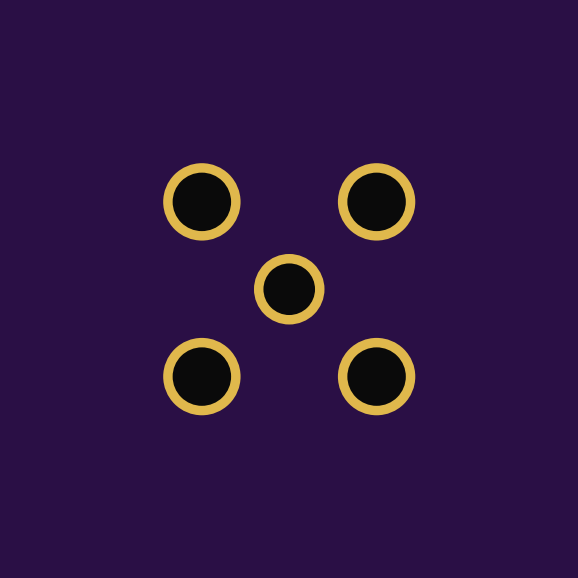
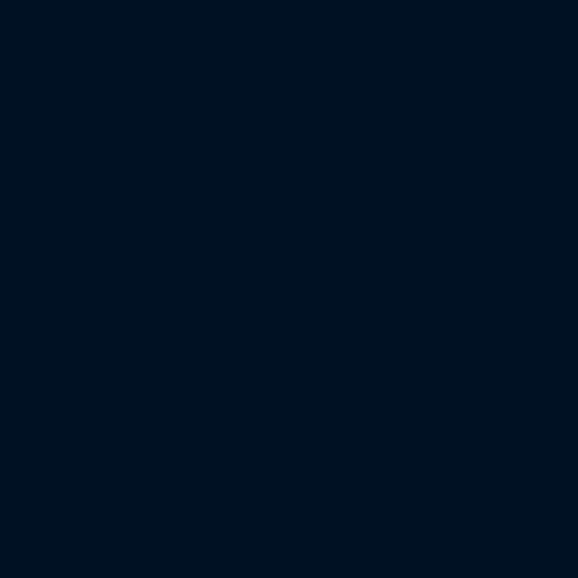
part: (289, 289) -> none

